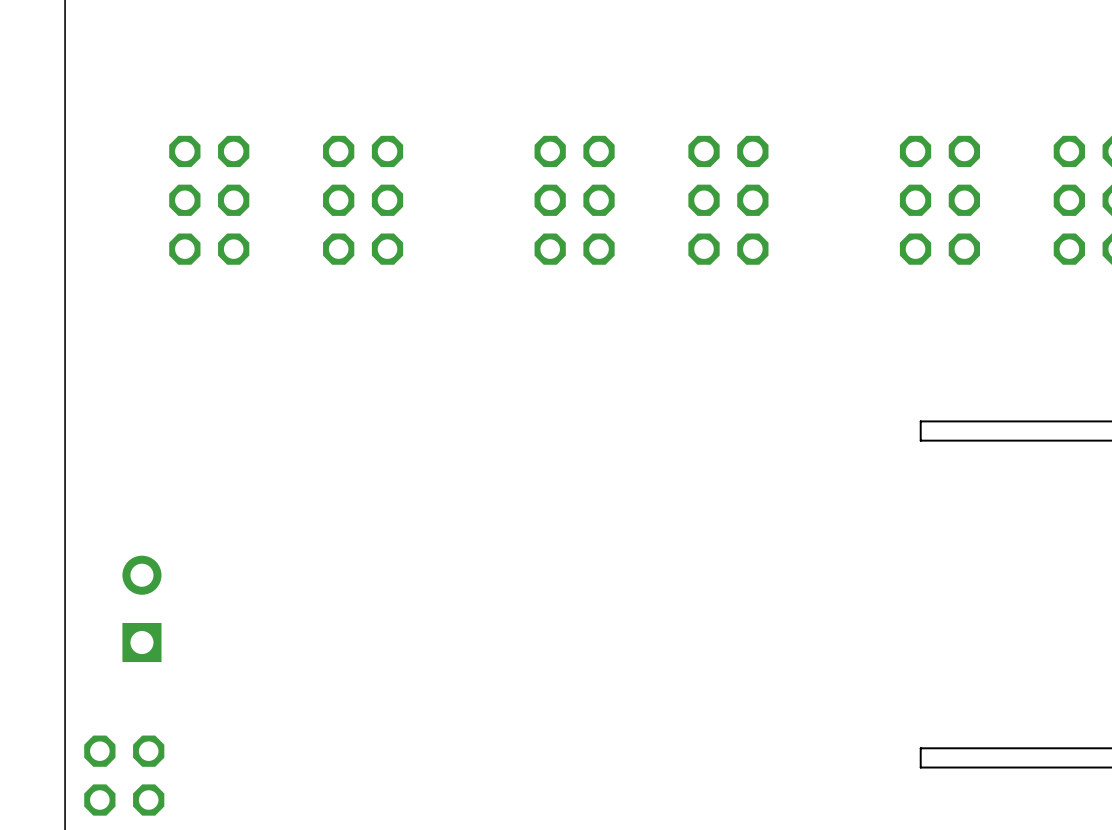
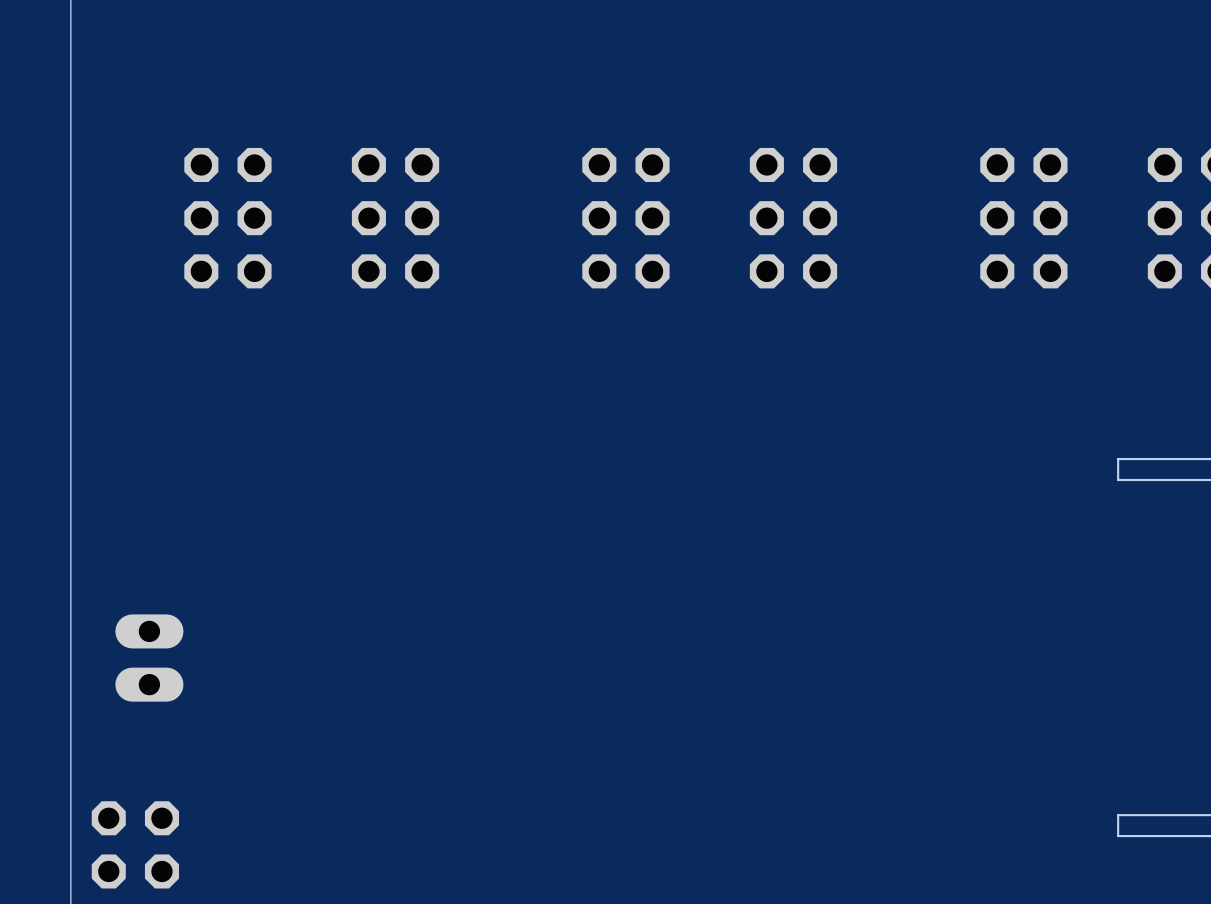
board edge: (1026, 421) (920, 421) (920, 440) (1026, 440) -> (1118, 459) (1118, 479)
part footprint: [122, 555, 162, 663] -> [115, 614, 184, 702]
board edge: (1026, 748) (920, 748) (920, 767) (1026, 767) -> (1118, 815) (1118, 836)

